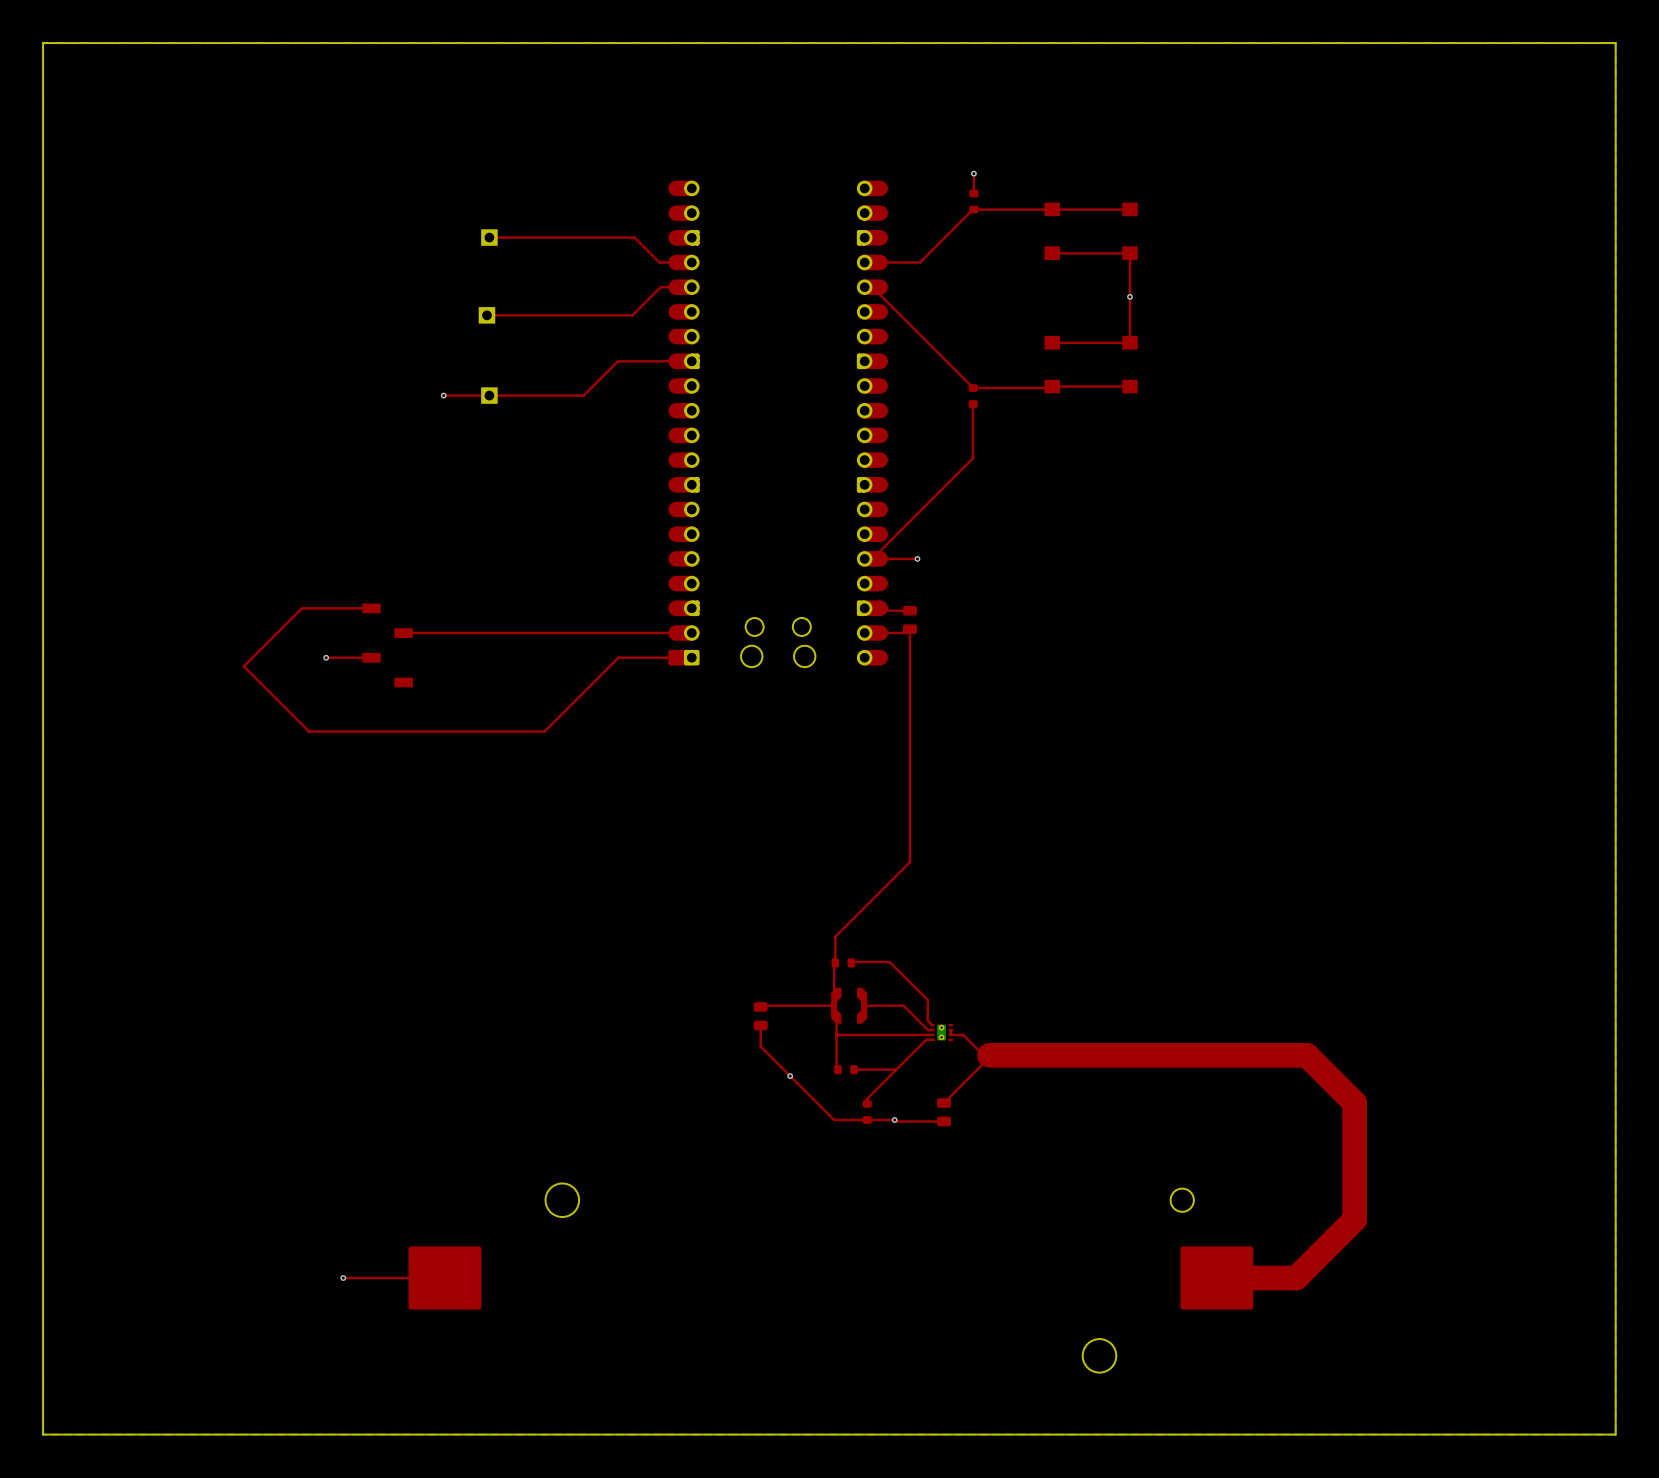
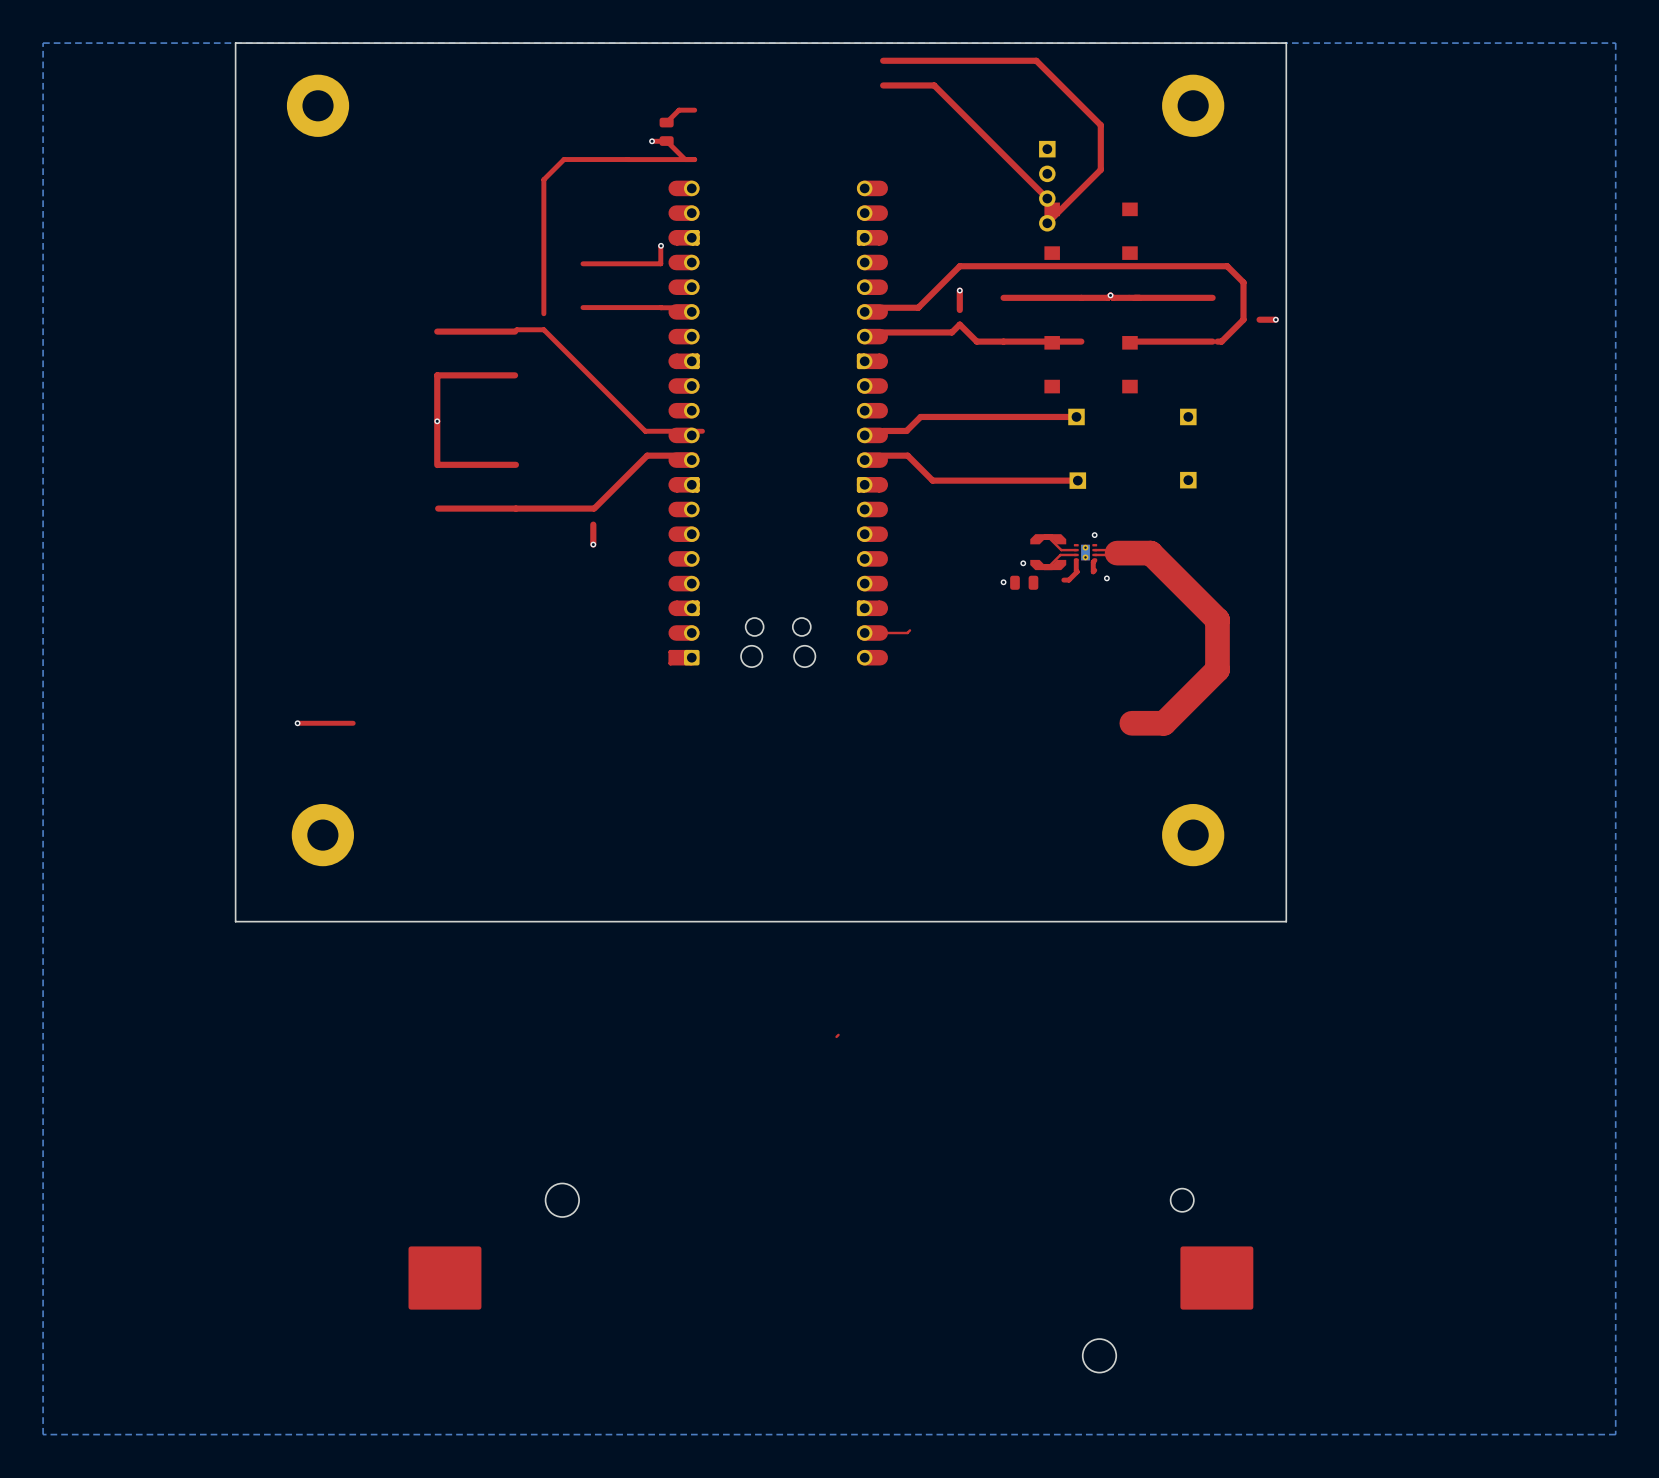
board edge: (1286, 43) (1615, 43) (1615, 1434) (43, 1434) (43, 43) (235, 43) -> (1286, 43) (1286, 921) (235, 921) (235, 43)
top track: none -> (883, 60) (1036, 60) (1100, 125) (1100, 169) (1047, 223)
top track: none -> (883, 85) (934, 85) (1047, 198)
part: none -> (318, 105)
part: none -> (1193, 105)
top track: none -> (694, 110) (679, 110) (666, 122)
part: none -> (666, 131)
top track: none -> (652, 141) (666, 141) (685, 159)
via: none -> (652, 141)
top track: none -> (627, 159) (564, 159) (543, 179) (543, 313)
top track: none -> (694, 159) (627, 159)
top track: (973, 173) (973, 193) -> none
via: (973, 173) -> none
part: none -> (1047, 186)
part: (973, 201) -> none
top track: (1129, 209) (972, 209) (920, 262) (872, 262) -> none
top track: (489, 237) (634, 237) (659, 262) (684, 262) -> none
part: (489, 237) -> none
top track: none -> (661, 245) (660, 263) (583, 263)
via: none -> (661, 245)
top track: (1129, 253) (1051, 253) -> (1212, 341) (1134, 341)
top track: (1129, 253) (1129, 342) (1052, 342) -> none
top track: (684, 287) (660, 287) (632, 315) (486, 315) -> none
top track: (872, 287) (973, 387) (1129, 386) -> none
top track: none -> (959, 290) (959, 310)
via: none -> (959, 290)
via position: (1129, 296) -> (1110, 295)
top track: none -> (1212, 297) (1112, 297) (1110, 295) (1108, 297) (1003, 297)
top track: none -> (583, 307) (694, 307)
top track: none -> (883, 307) (918, 307) (959, 266) (1227, 266) (1243, 282) (1243, 319) (1221, 341) (1217, 341)
part: (486, 315) -> none
top track: none -> (1275, 319) (1259, 319)
via: none -> (1275, 319)
top track: none -> (515, 331) (437, 331)
top track: none -> (515, 331) (516, 329) (543, 329) (645, 431) (702, 431)
top track: none -> (883, 332) (951, 332) (959, 324) (976, 341) (1081, 341)
top track: (684, 361) (617, 361) (583, 395) (443, 395) -> none
top track: none -> (515, 375) (437, 375) (437, 465)
via position: (443, 395) -> (437, 421)
part: (489, 395) -> none
part: (973, 396) -> none
top track: (973, 407) (973, 458) (872, 558) (917, 558) -> none
part: none -> (1076, 416)
top track: none -> (1080, 416) (920, 416) (906, 430) (883, 430)
part: none -> (1188, 416)
top track: none -> (694, 455) (647, 455) (594, 508) (438, 508)
top track: none -> (883, 455) (907, 455) (932, 480) (1077, 480)
top track: none -> (515, 464) (438, 464)
part: none -> (1077, 480)
part: none -> (1188, 480)
top track: none -> (593, 524) (593, 544)
via: none -> (1094, 535)
top track: none -> (1048, 537) (1061, 550) (1076, 550)
via: none -> (593, 544)
top track: none -> (1094, 550) (1107, 550) (1110, 553) (1108, 554) (1094, 554)
part: none -> (1048, 552)
part: none -> (1085, 552)
top track: none -> (1117, 553) (1150, 553) (1217, 619) (1217, 669) (1164, 723) (1131, 723)
top track: none -> (1076, 554) (1060, 554) (1048, 567)
via: (917, 558) -> none
top track: none -> (1076, 560) (1077, 571) (1068, 580) (1063, 580)
top track: none -> (1094, 560) (1093, 571) (1094, 570)
via: none -> (1023, 563)
via: none -> (1106, 578)
via: none -> (1003, 582)
top track: (371, 608) (301, 608) (243, 666) (308, 731) (544, 731) (618, 657) (684, 657) -> none
top track: (872, 608) (874, 610) (909, 610) -> none
part rotation: 0° (909, 619) -> 90° clockwise (1024, 582)
part position: (909, 619) -> (1024, 582)
top track: (909, 629) (909, 862) (835, 936) (835, 962) -> none
top track: (684, 633) (403, 633) -> none
part: (387, 645) -> none
via: (326, 657) -> none
top track: (371, 657) (326, 657) -> none
via: none -> (297, 723)
top track: none -> (353, 723) (298, 723)
part: none -> (322, 835)
part: none -> (1193, 835)
top track: (855, 961) (889, 961) (927, 1000) (927, 1020) (932, 1025) -> none
part: (843, 962) -> none
top track: (834, 967) (834, 1005) (768, 1005) -> none
part: (849, 1005) -> none
top track: (879, 1005) (903, 1005) (927, 1030) (932, 1030) -> none
top track: (879, 1005) (864, 1005) -> none
part: (760, 1016) -> none
top track: (836, 1022) (836, 1067) -> none
top track: (760, 1025) (760, 1046) (834, 1120) (944, 1121) -> none
top track: (950, 1030) (950, 1034) (963, 1034) (983, 1055) (989, 1055) -> none
part: (941, 1032) -> none
top track: (932, 1034) (836, 1034) -> none
top track: (932, 1039) (926, 1039) (867, 1098) (867, 1103) -> none
top track: (989, 1055) (989, 1057) (944, 1102) -> none
top track: (989, 1055) (1306, 1055) (1354, 1102) (1354, 1219) (1296, 1278) (1216, 1278) -> none
part: (846, 1069) -> none
top track: (896, 1069) (854, 1069) -> none
via: (790, 1076) -> none
part: (867, 1111) -> none
part: (944, 1112) -> none
via: (894, 1120) -> none
via: (343, 1278) -> none
top track: (444, 1278) (343, 1278) -> none

